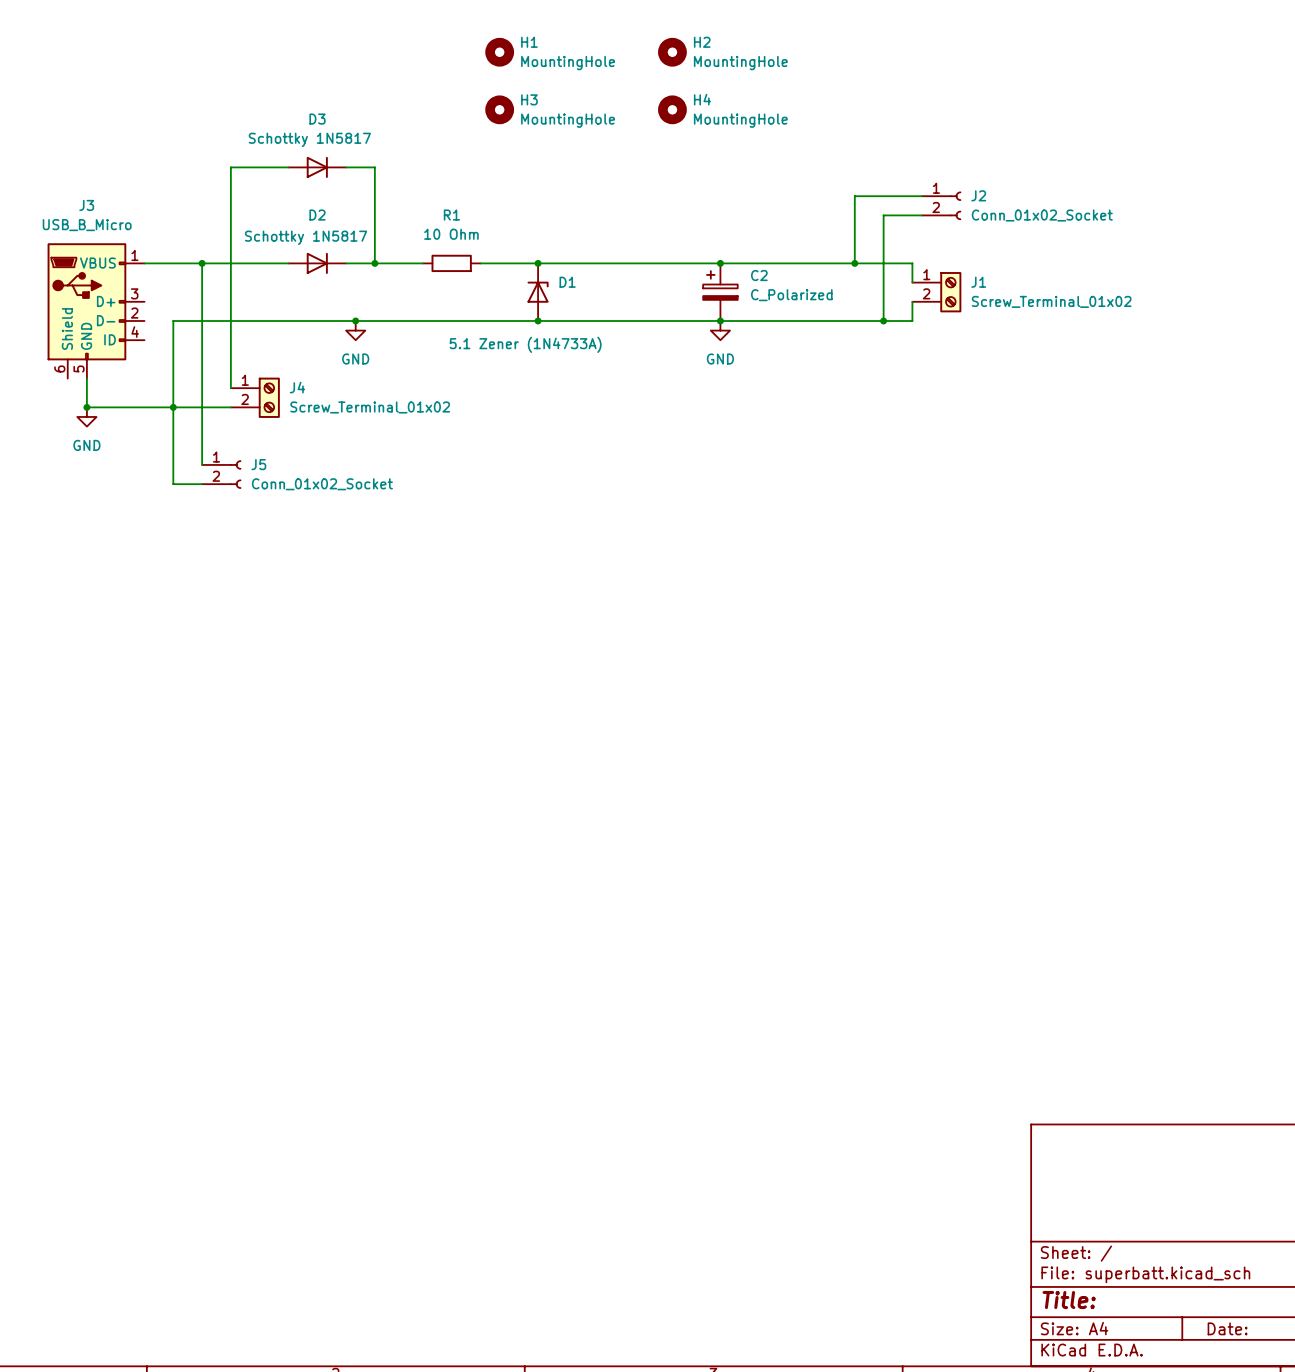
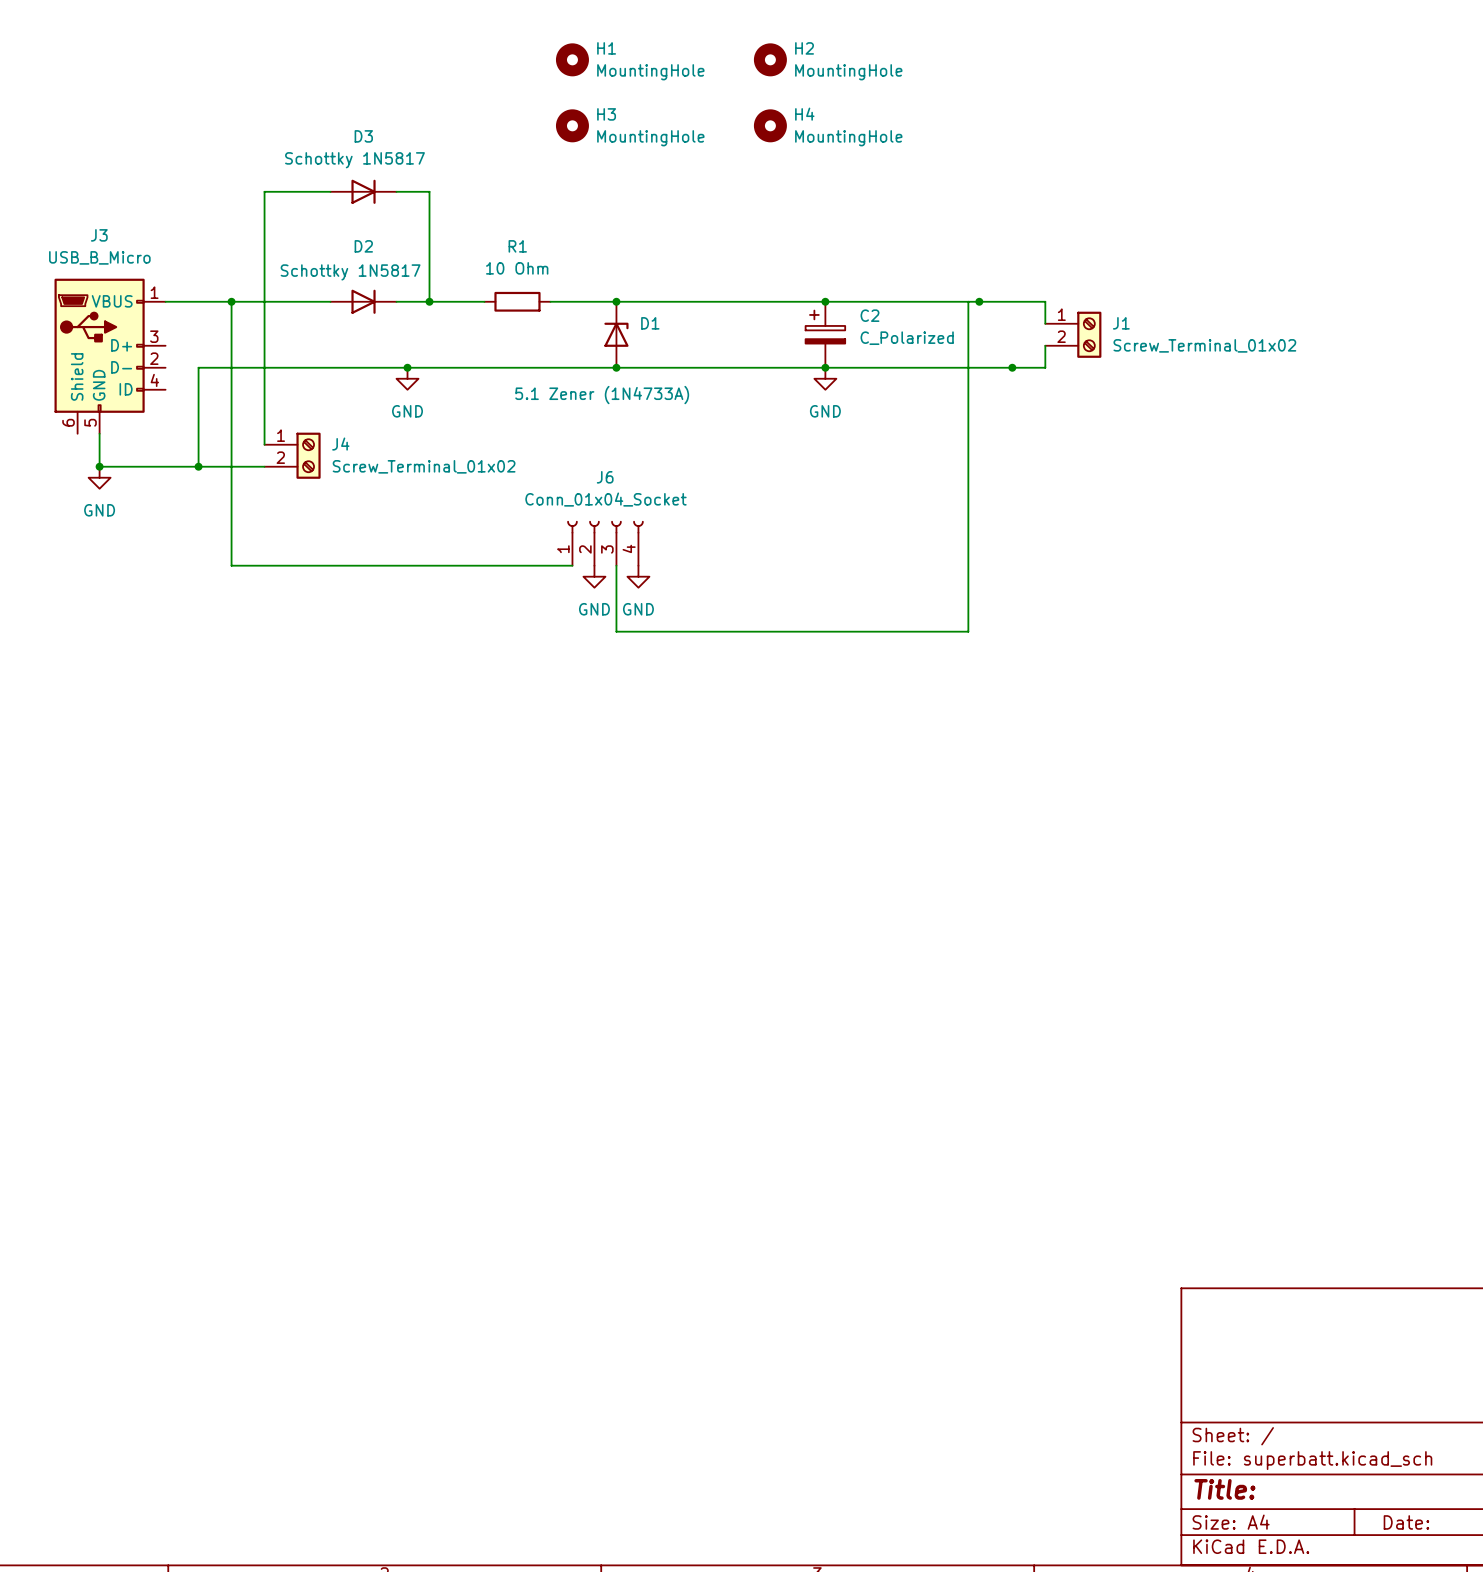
wire: (922, 196) (854, 196) (854, 263) -> none
J2: Conn_01x02_Socket (941, 205) -> none
wire: (922, 215) (883, 215) (883, 320) -> none
wire: none -> (968, 301) (968, 631) (616, 631) (616, 565)
wire: (173, 407) (173, 484) (202, 484) -> none
wire: none -> (231, 532) (231, 565) (572, 565)
J5: Conn_01x02_Socket (221, 474) -> none
J6: none -> Conn_01x04_Socket (605, 543)
power symbol: none -> GND (594, 576)
power symbol: none -> GND (638, 576)

